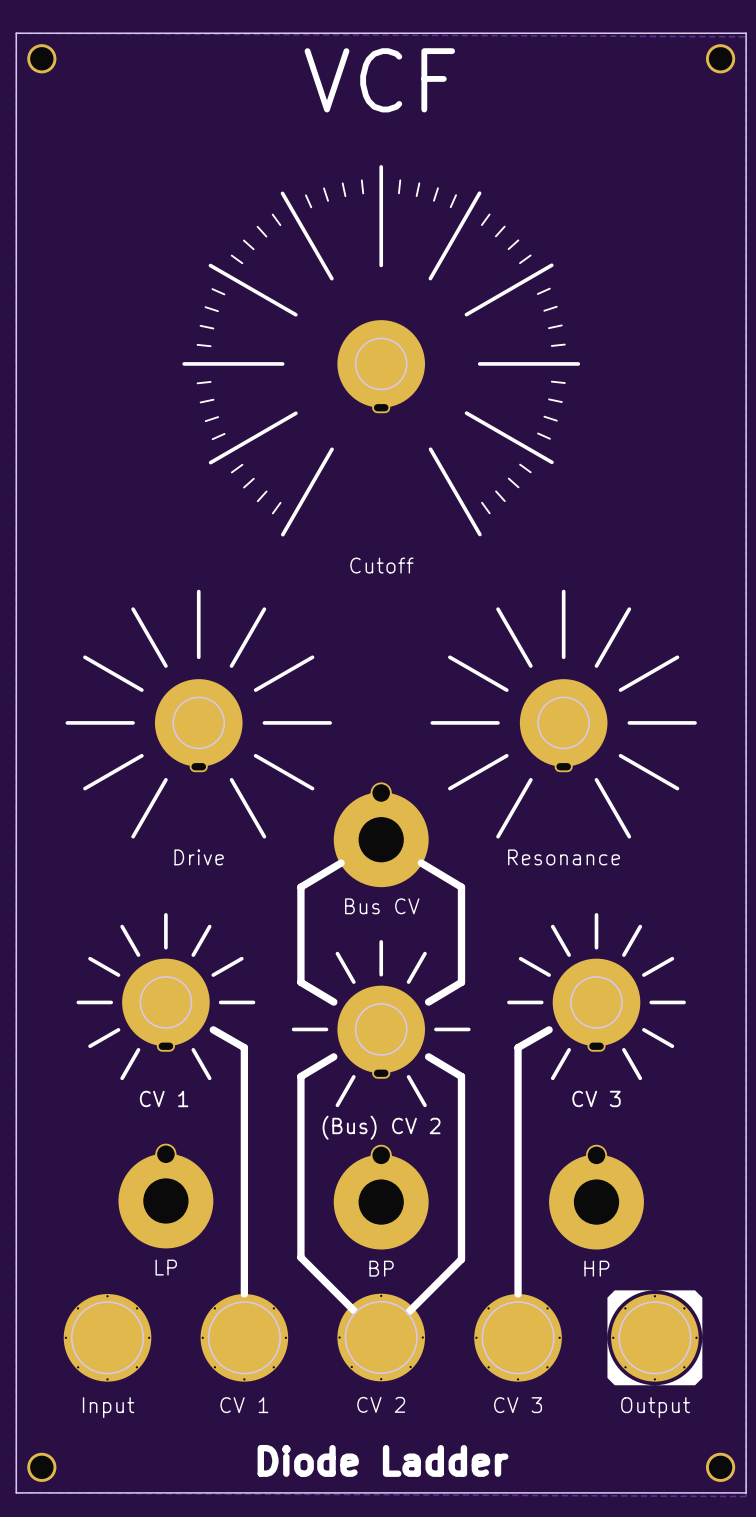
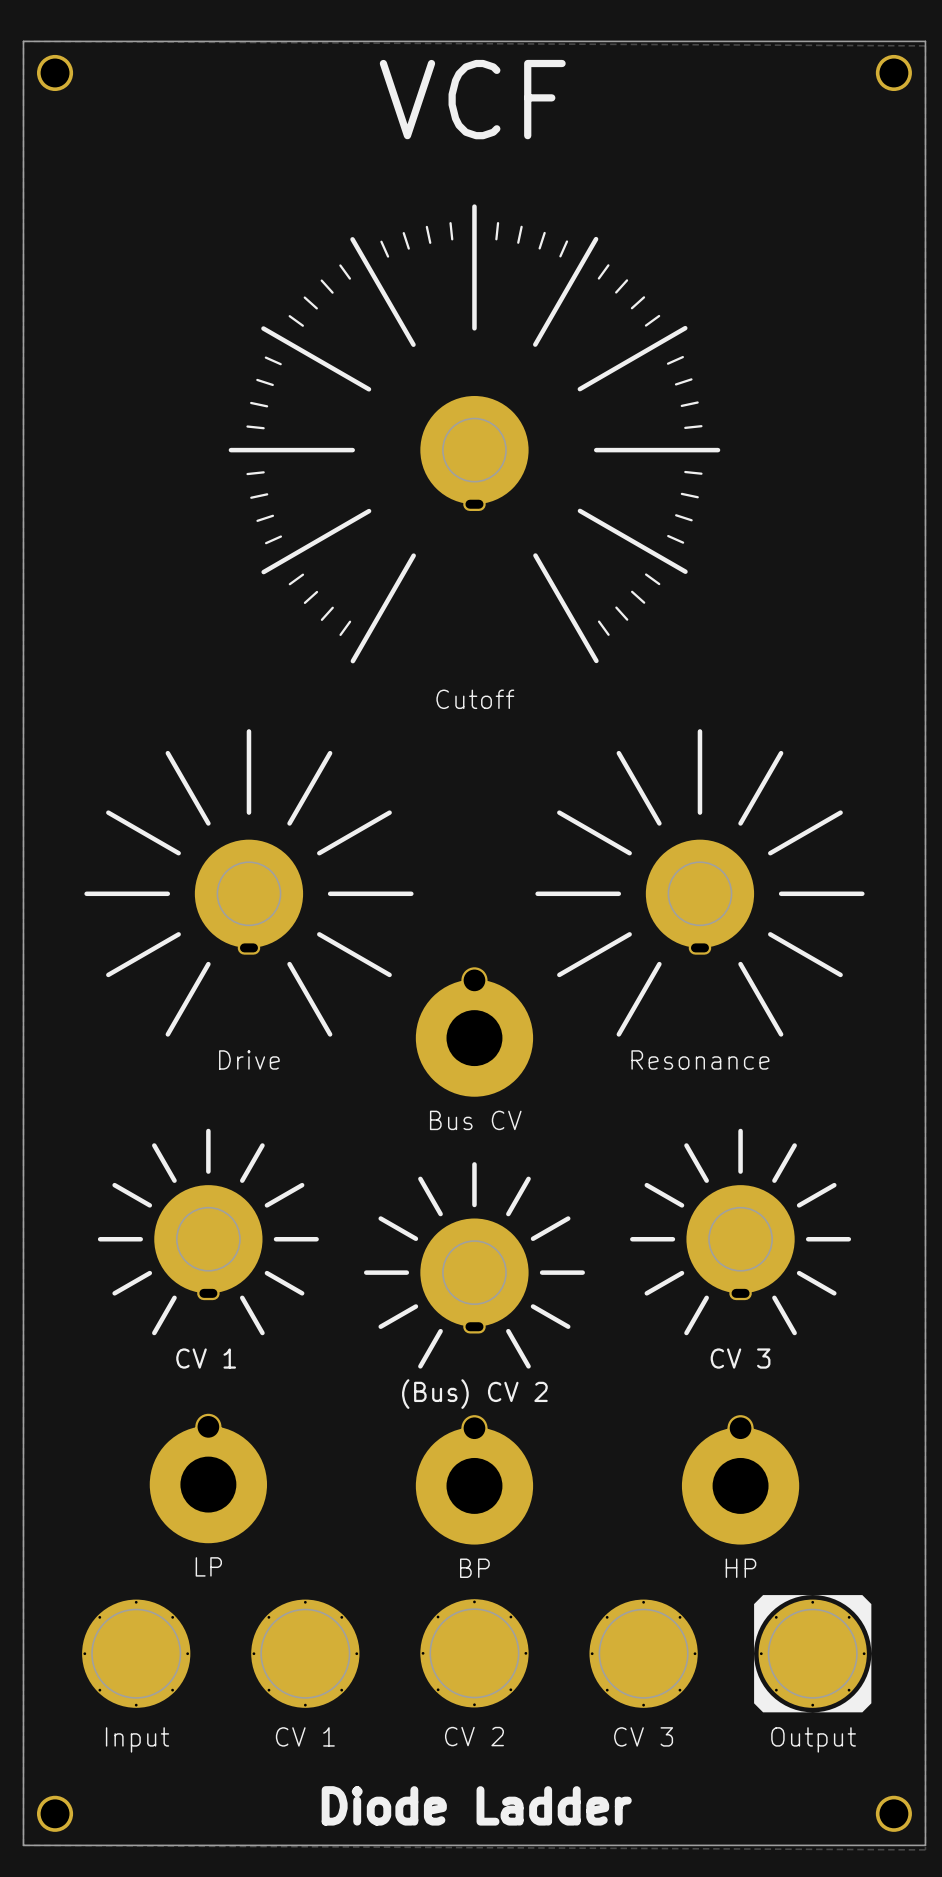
line: (341, 863) (300, 887) (300, 982) (333, 1002) -> none
line: (421, 863) (461, 887) (461, 982) (428, 1002) -> none
line: (213, 1029) (244, 1047) (244, 1294) -> none
line: (549, 1029) (518, 1047) (518, 1294) -> none
line: (333, 1056) (300, 1076) (300, 1257) (353, 1310) -> none
line: (428, 1056) (461, 1076) (461, 1259) (409, 1311) -> none

